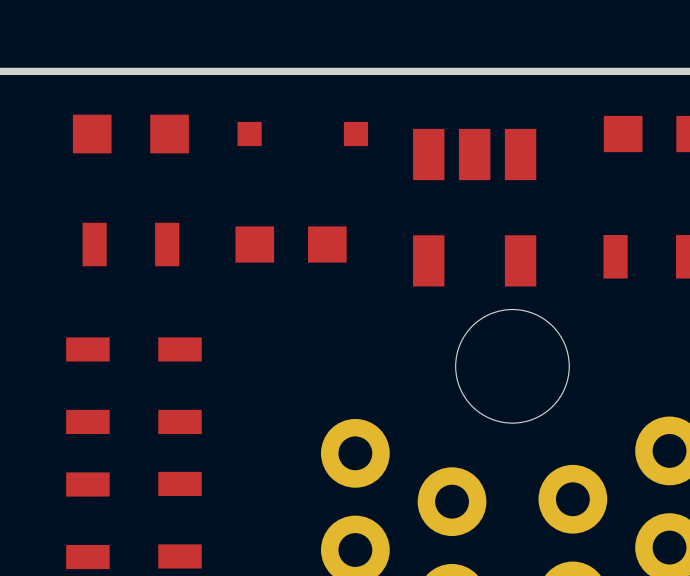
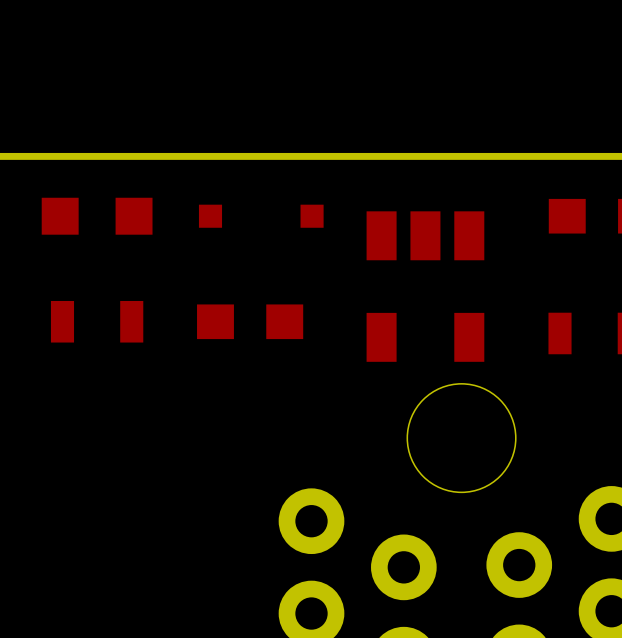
part: (87, 385) -> none
part: (179, 385) -> none
part: (87, 520) -> none
part: (179, 520) -> none

